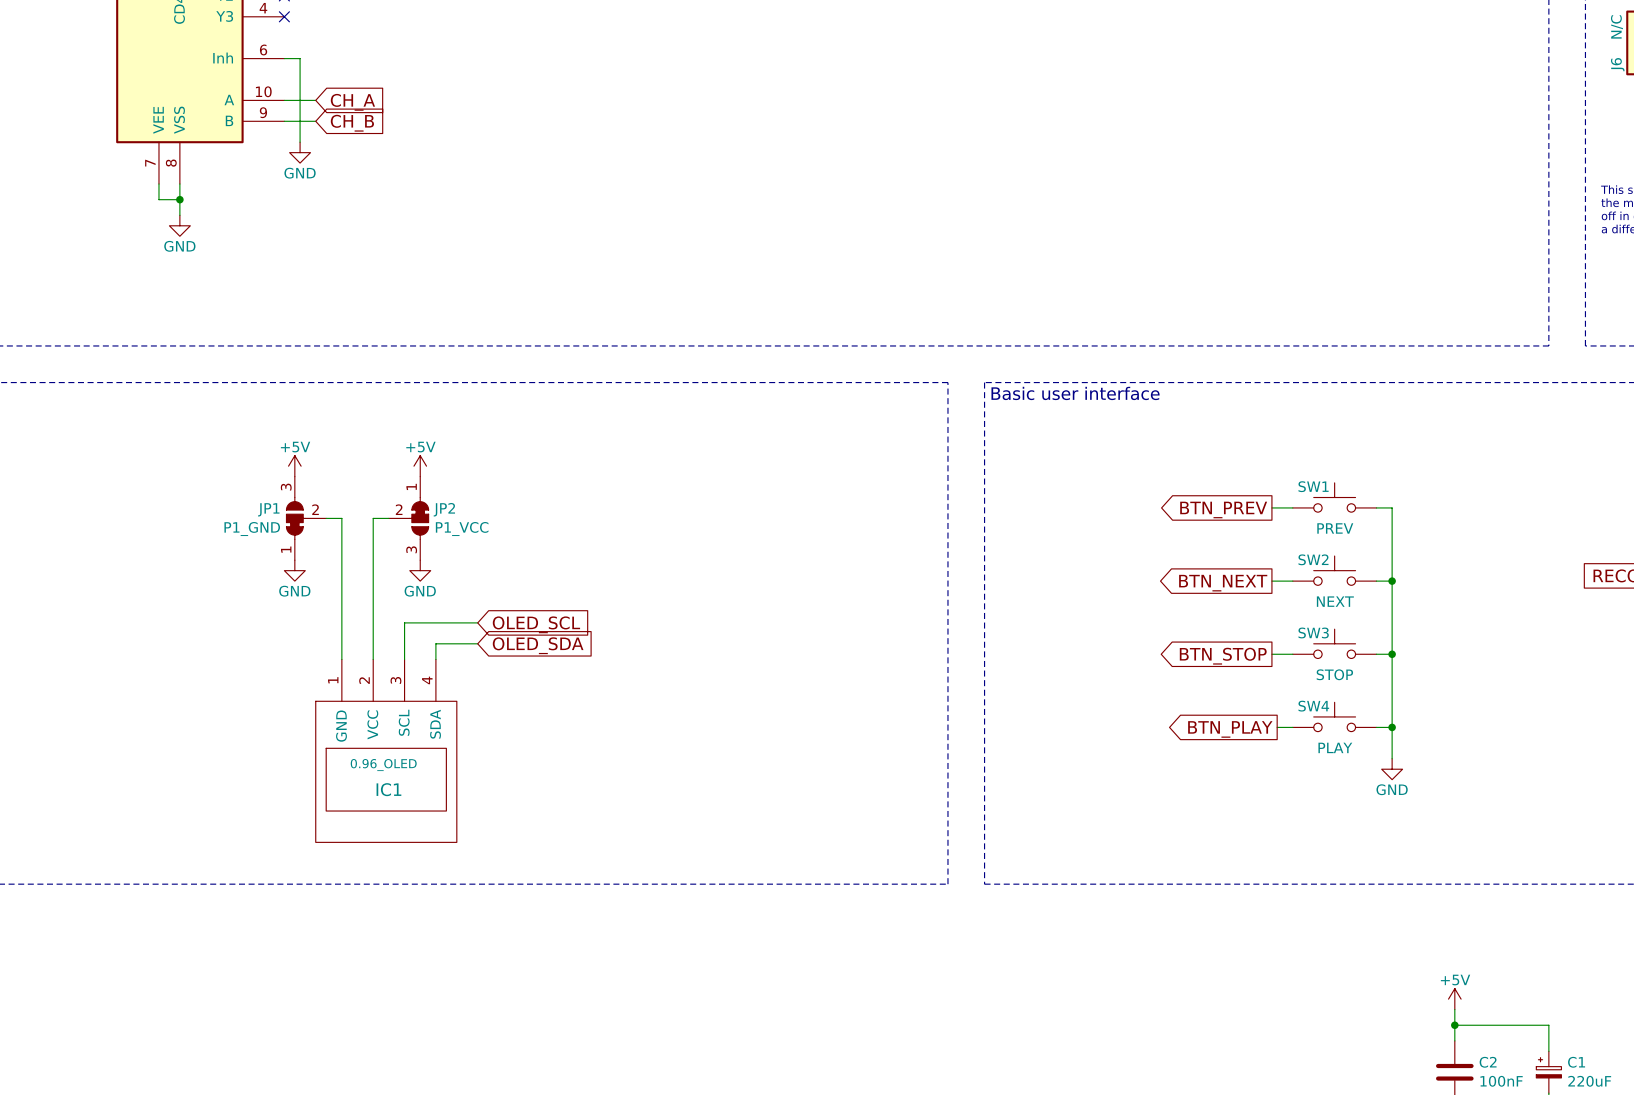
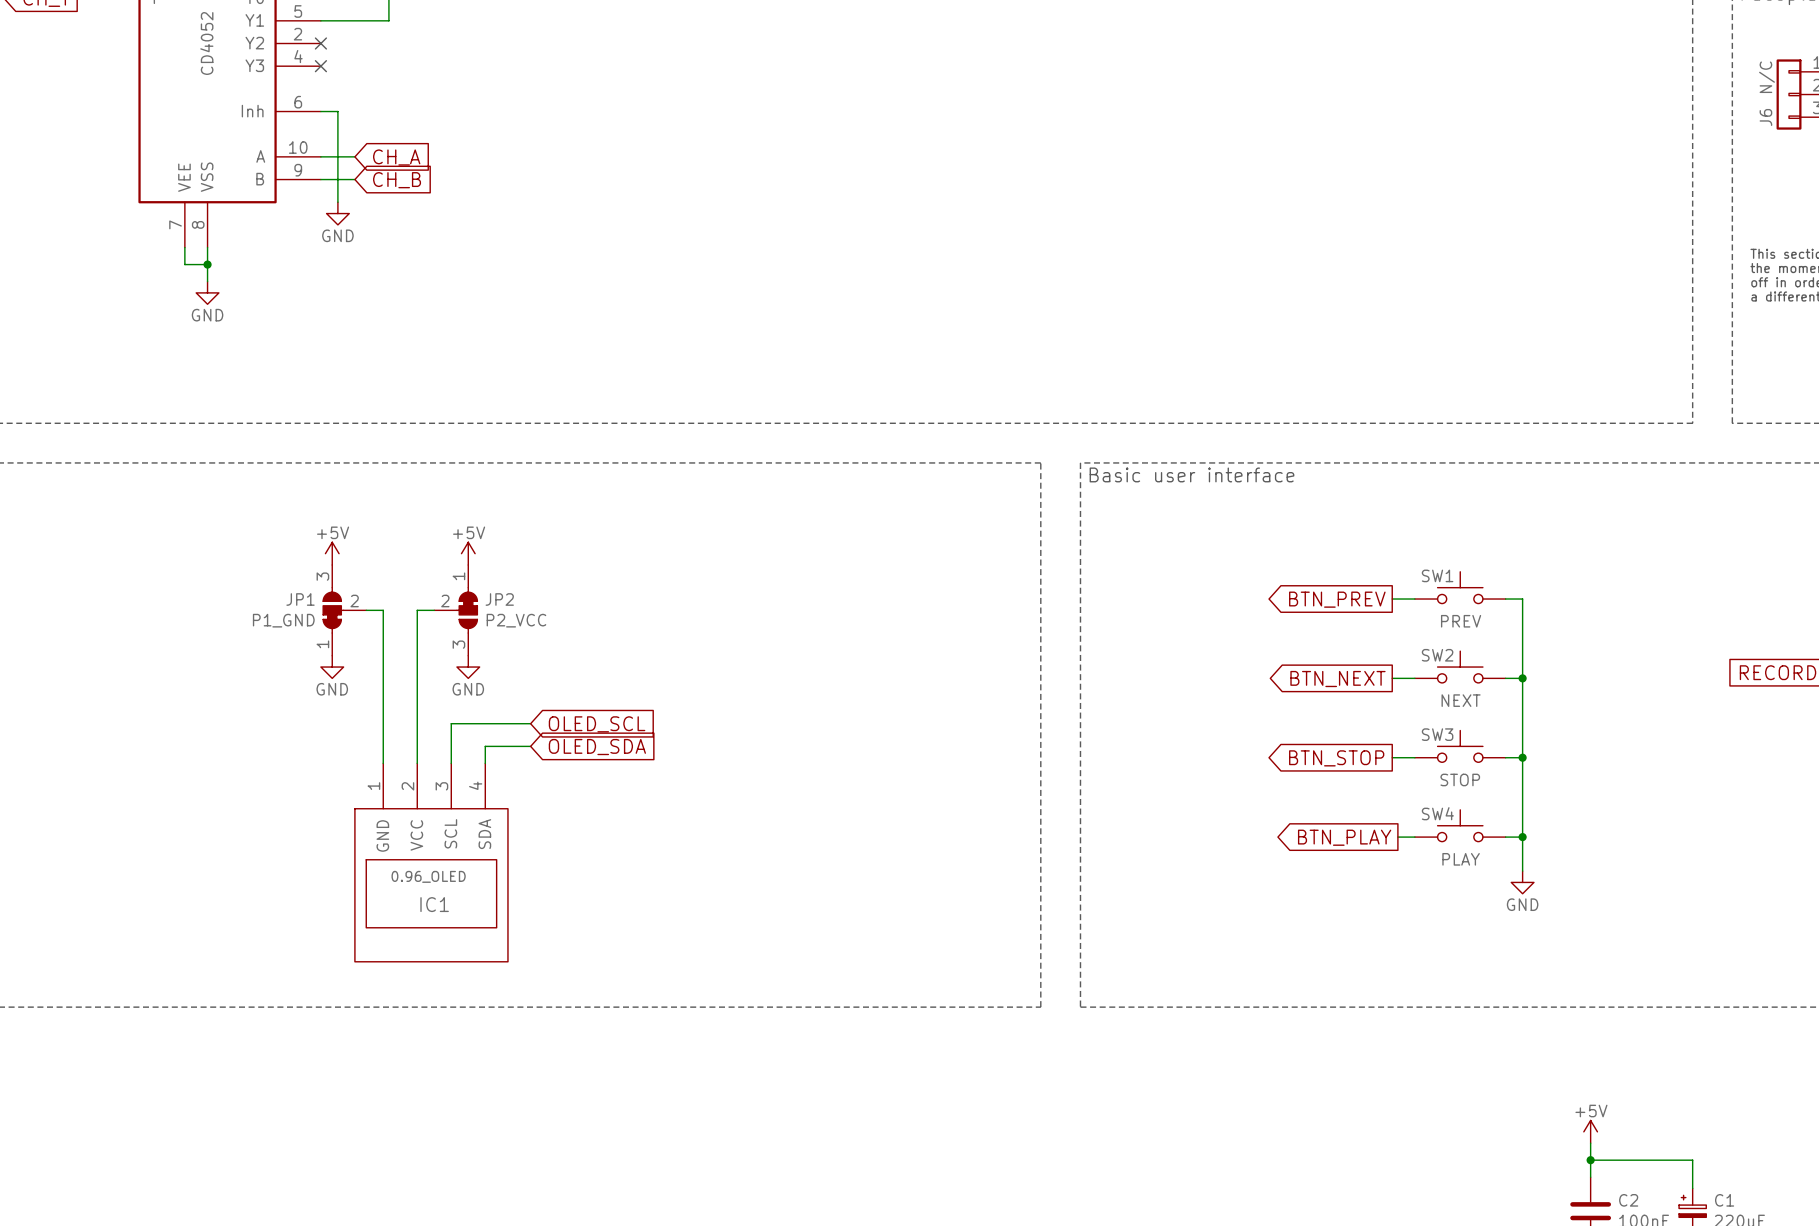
JP2 value: P1_VCC (462, 529) -> P2_VCC (516, 620)

